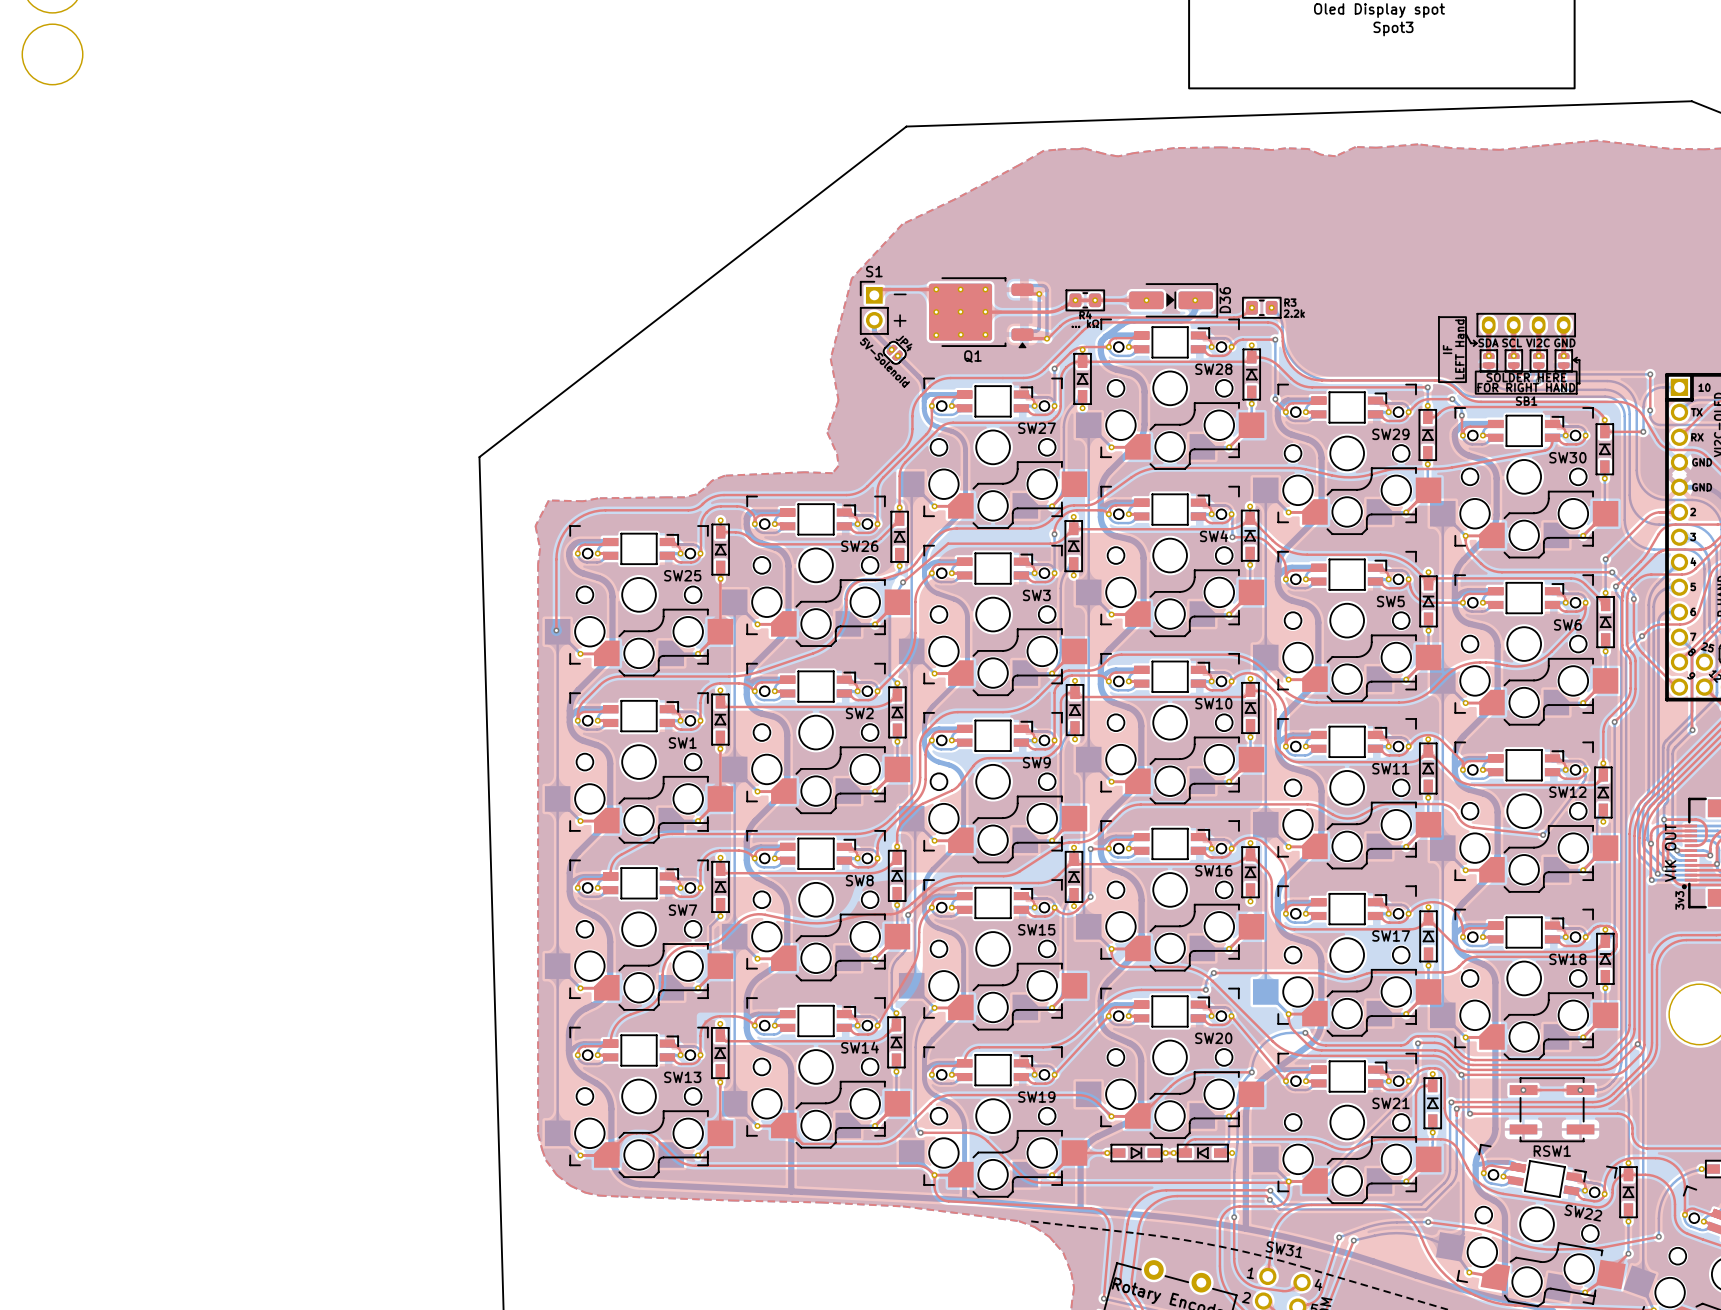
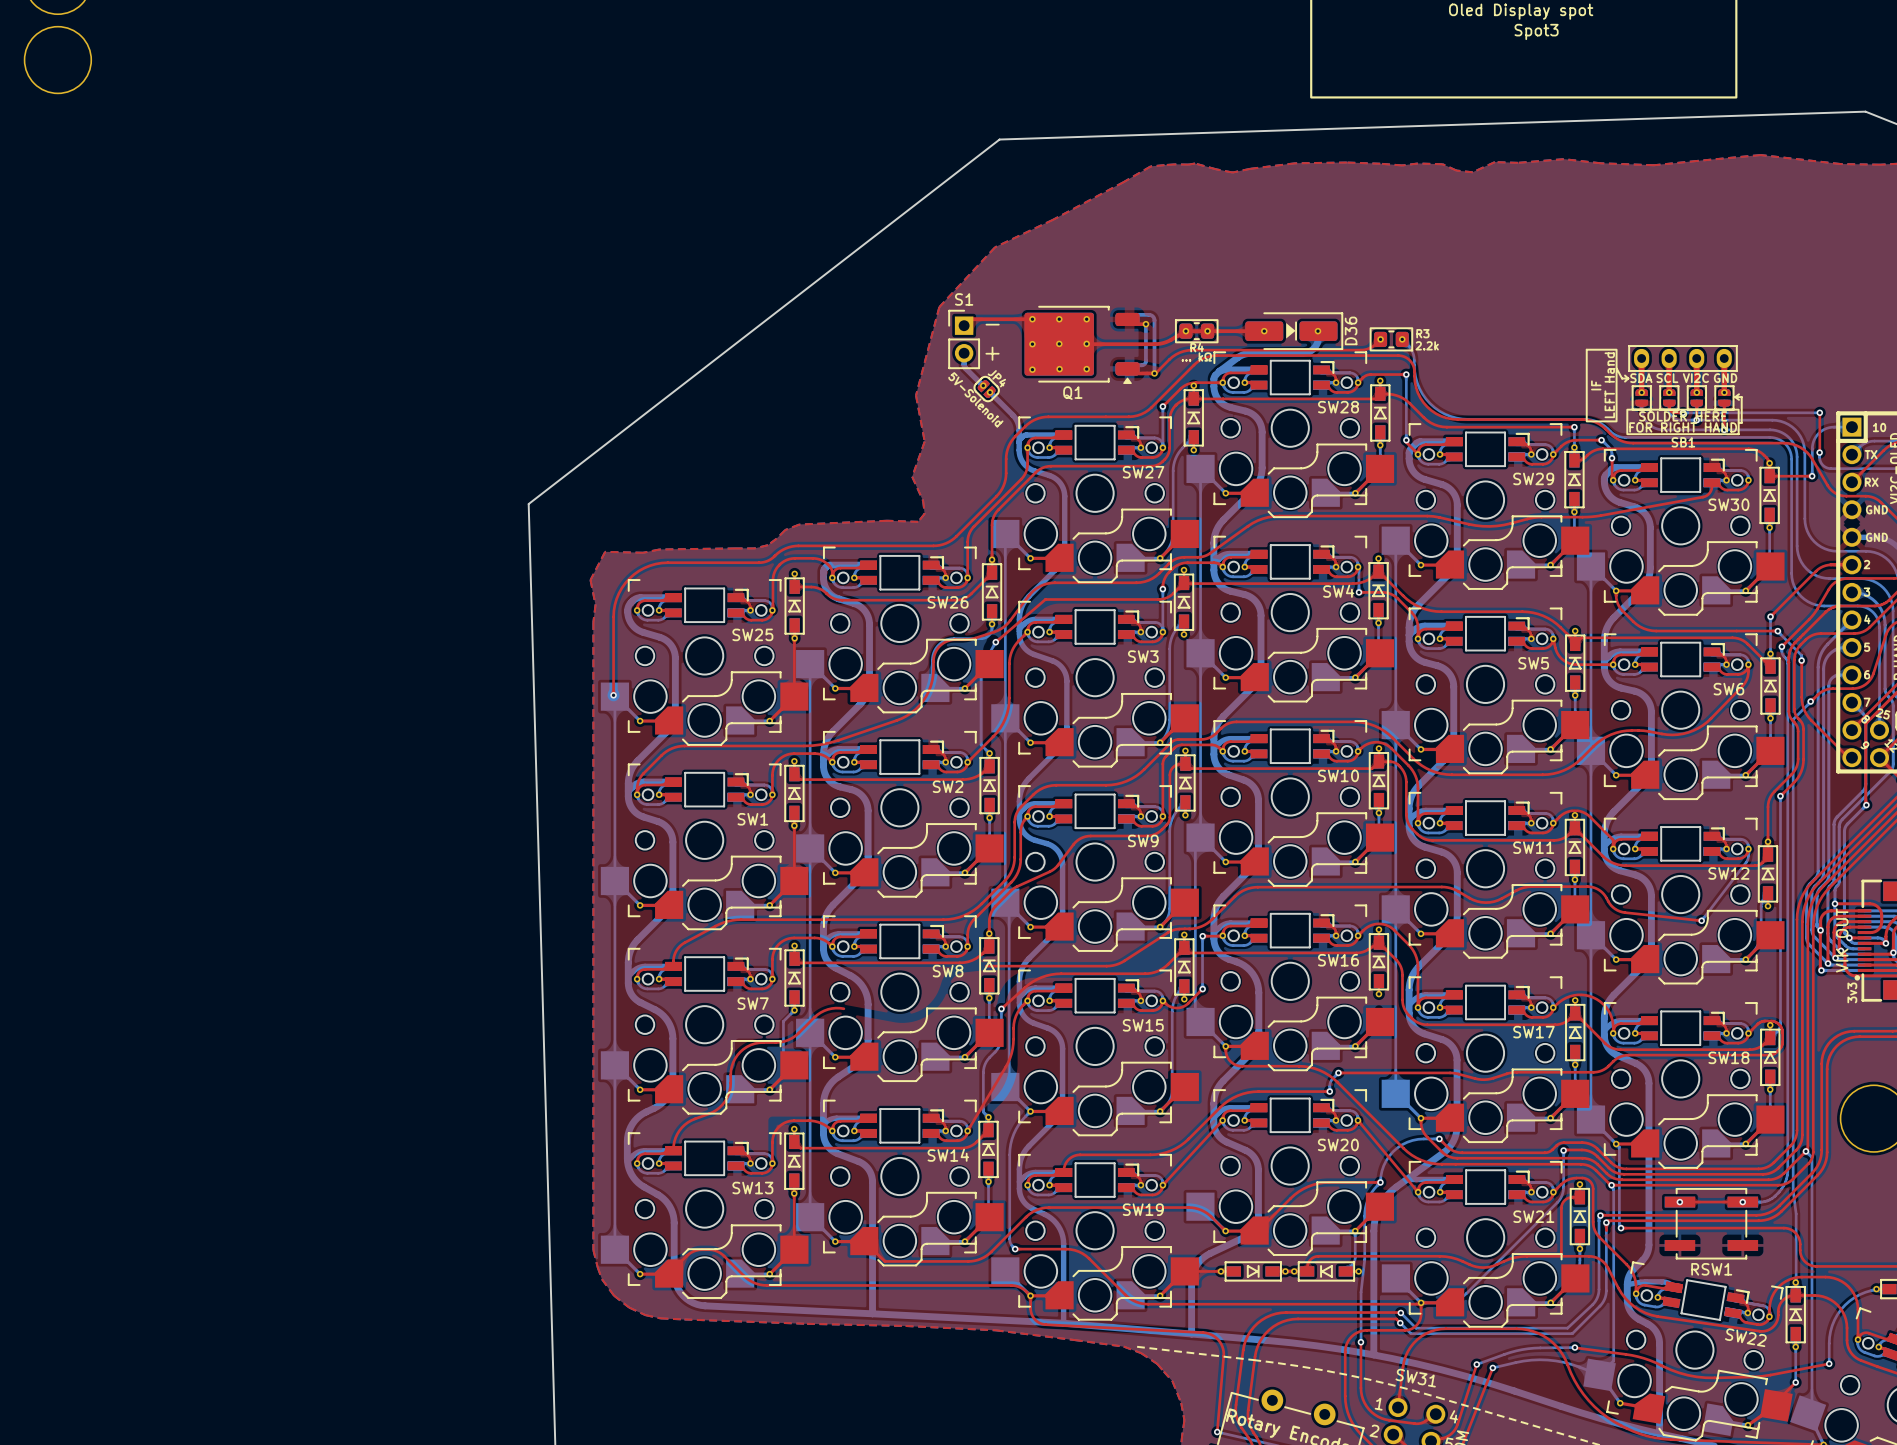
top track: (961, 876) (948, 877) (935, 883) (907, 906) (893, 914) (863, 915) (817, 923) (765, 914) -> (1060, 966) (986, 966)

